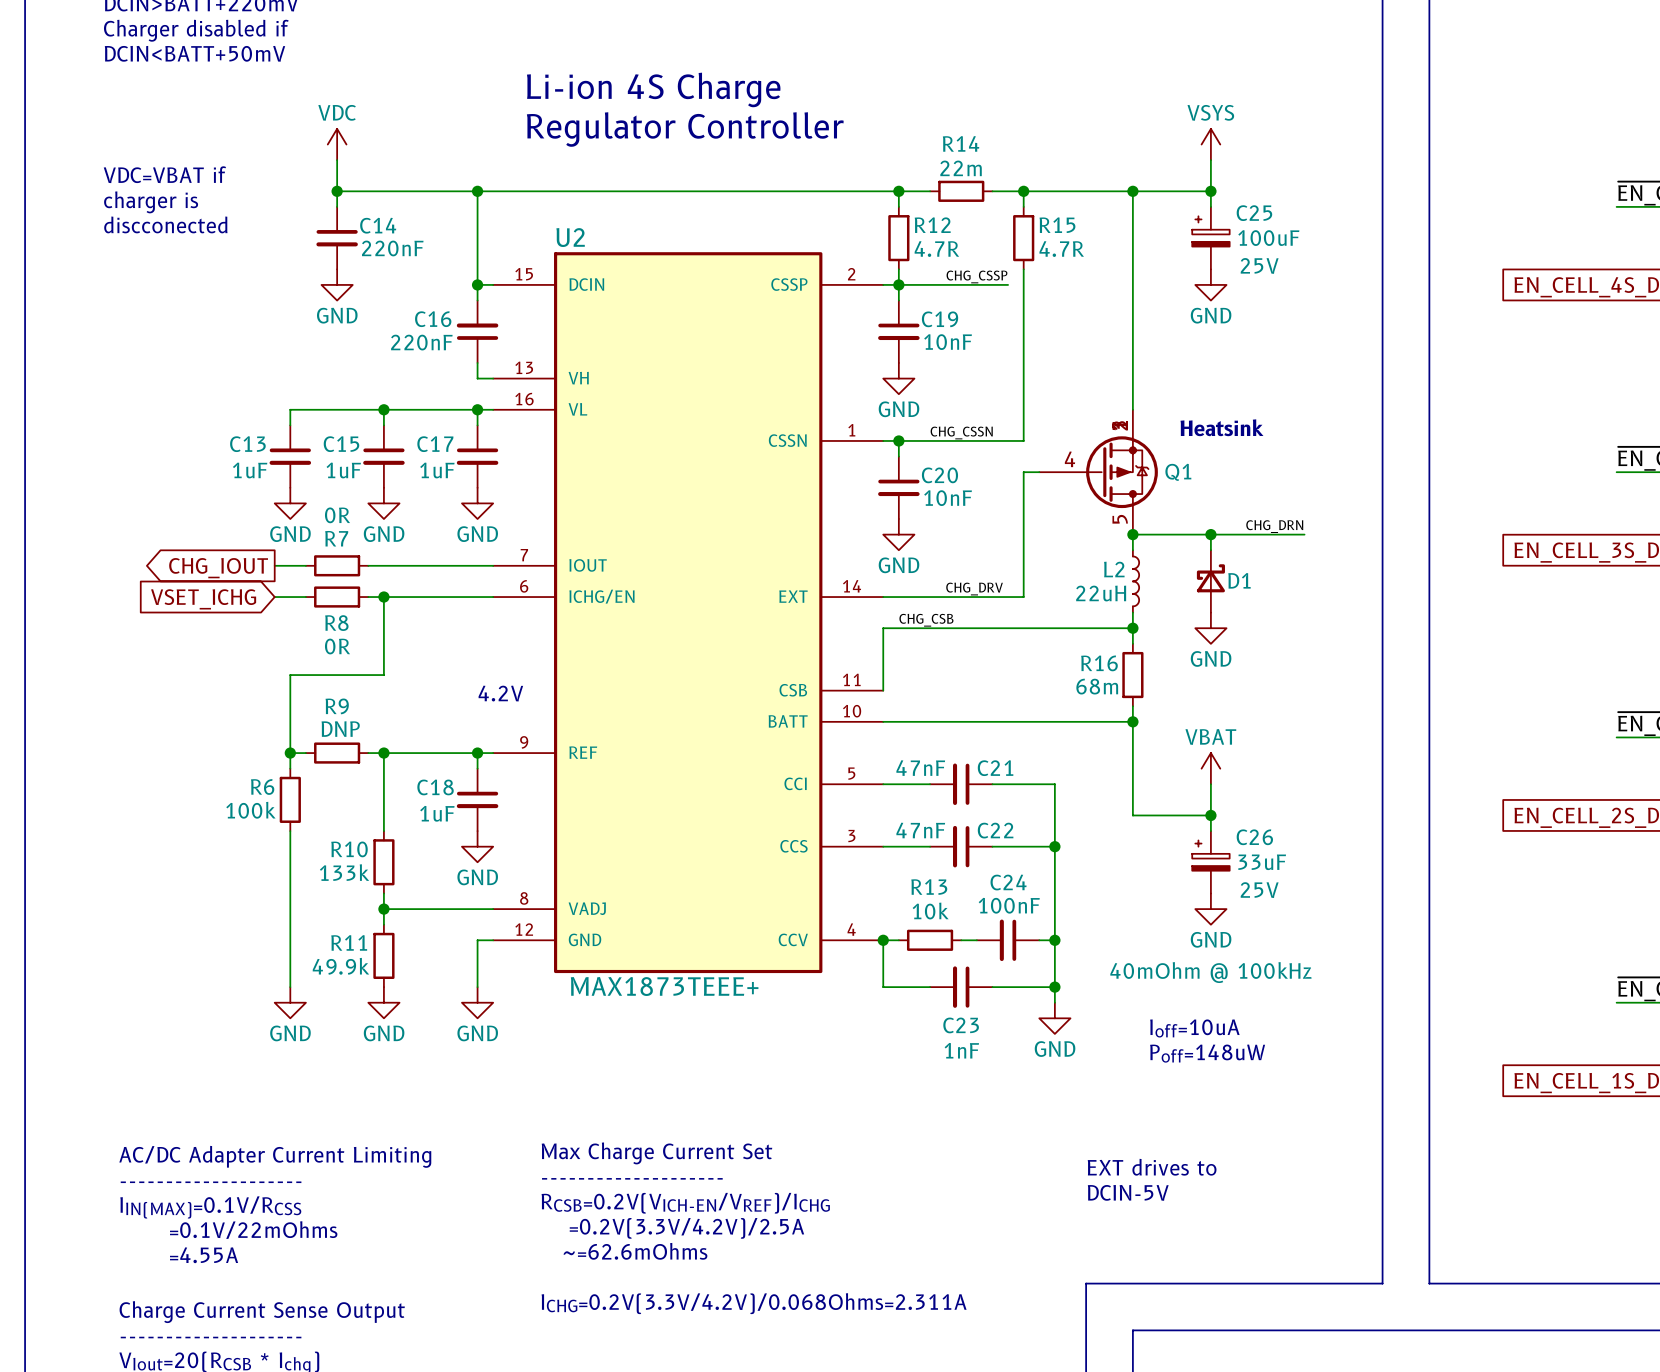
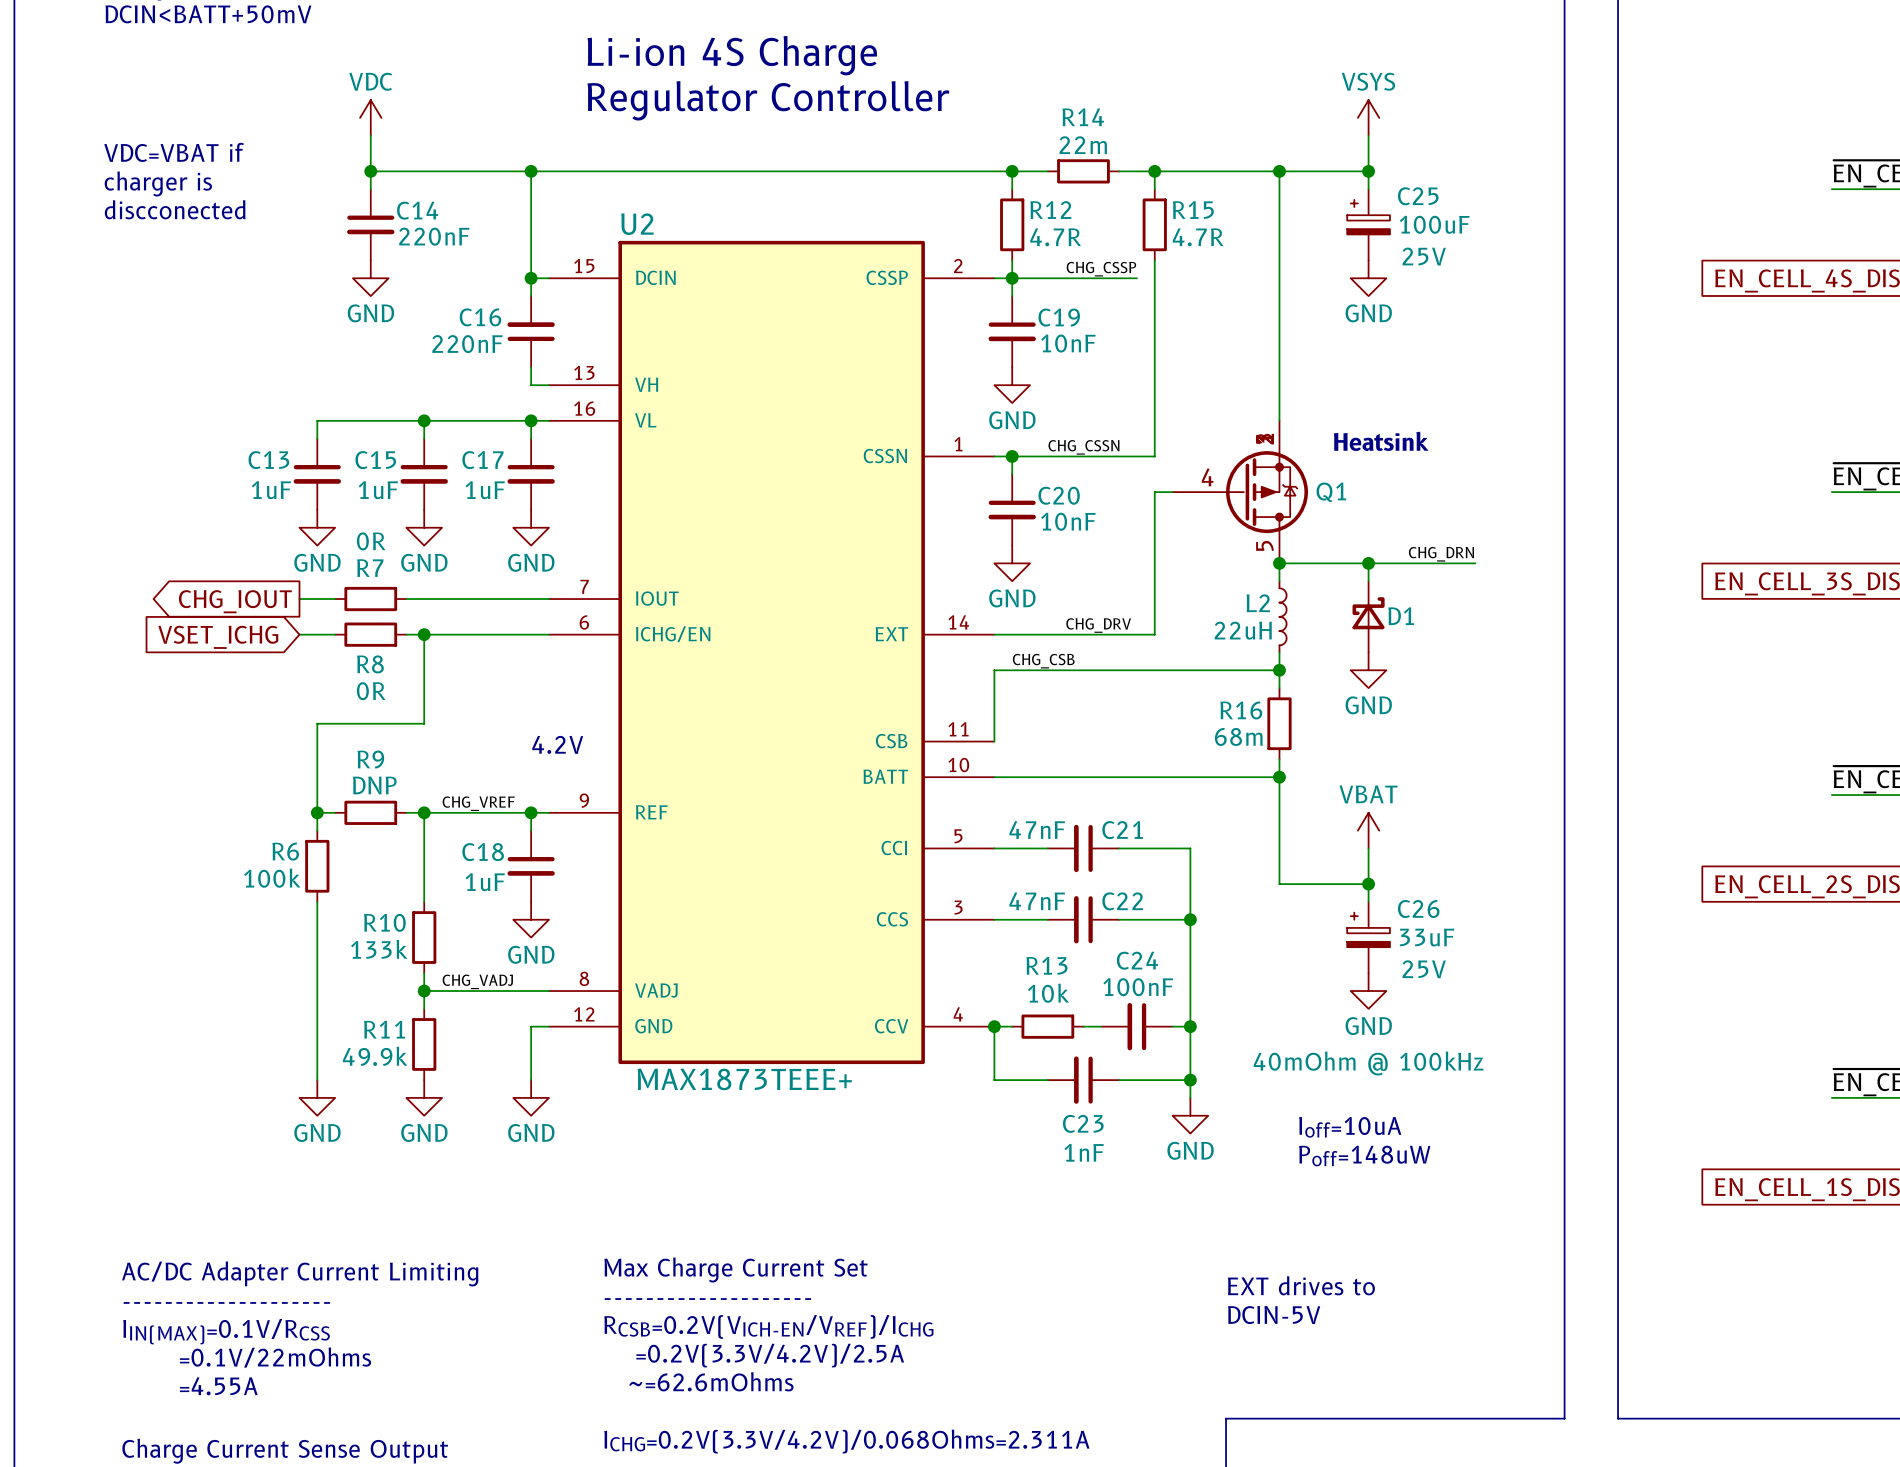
label: none -> CHG_VREF (478, 803)
label: none -> CHG_VADJ (477, 981)

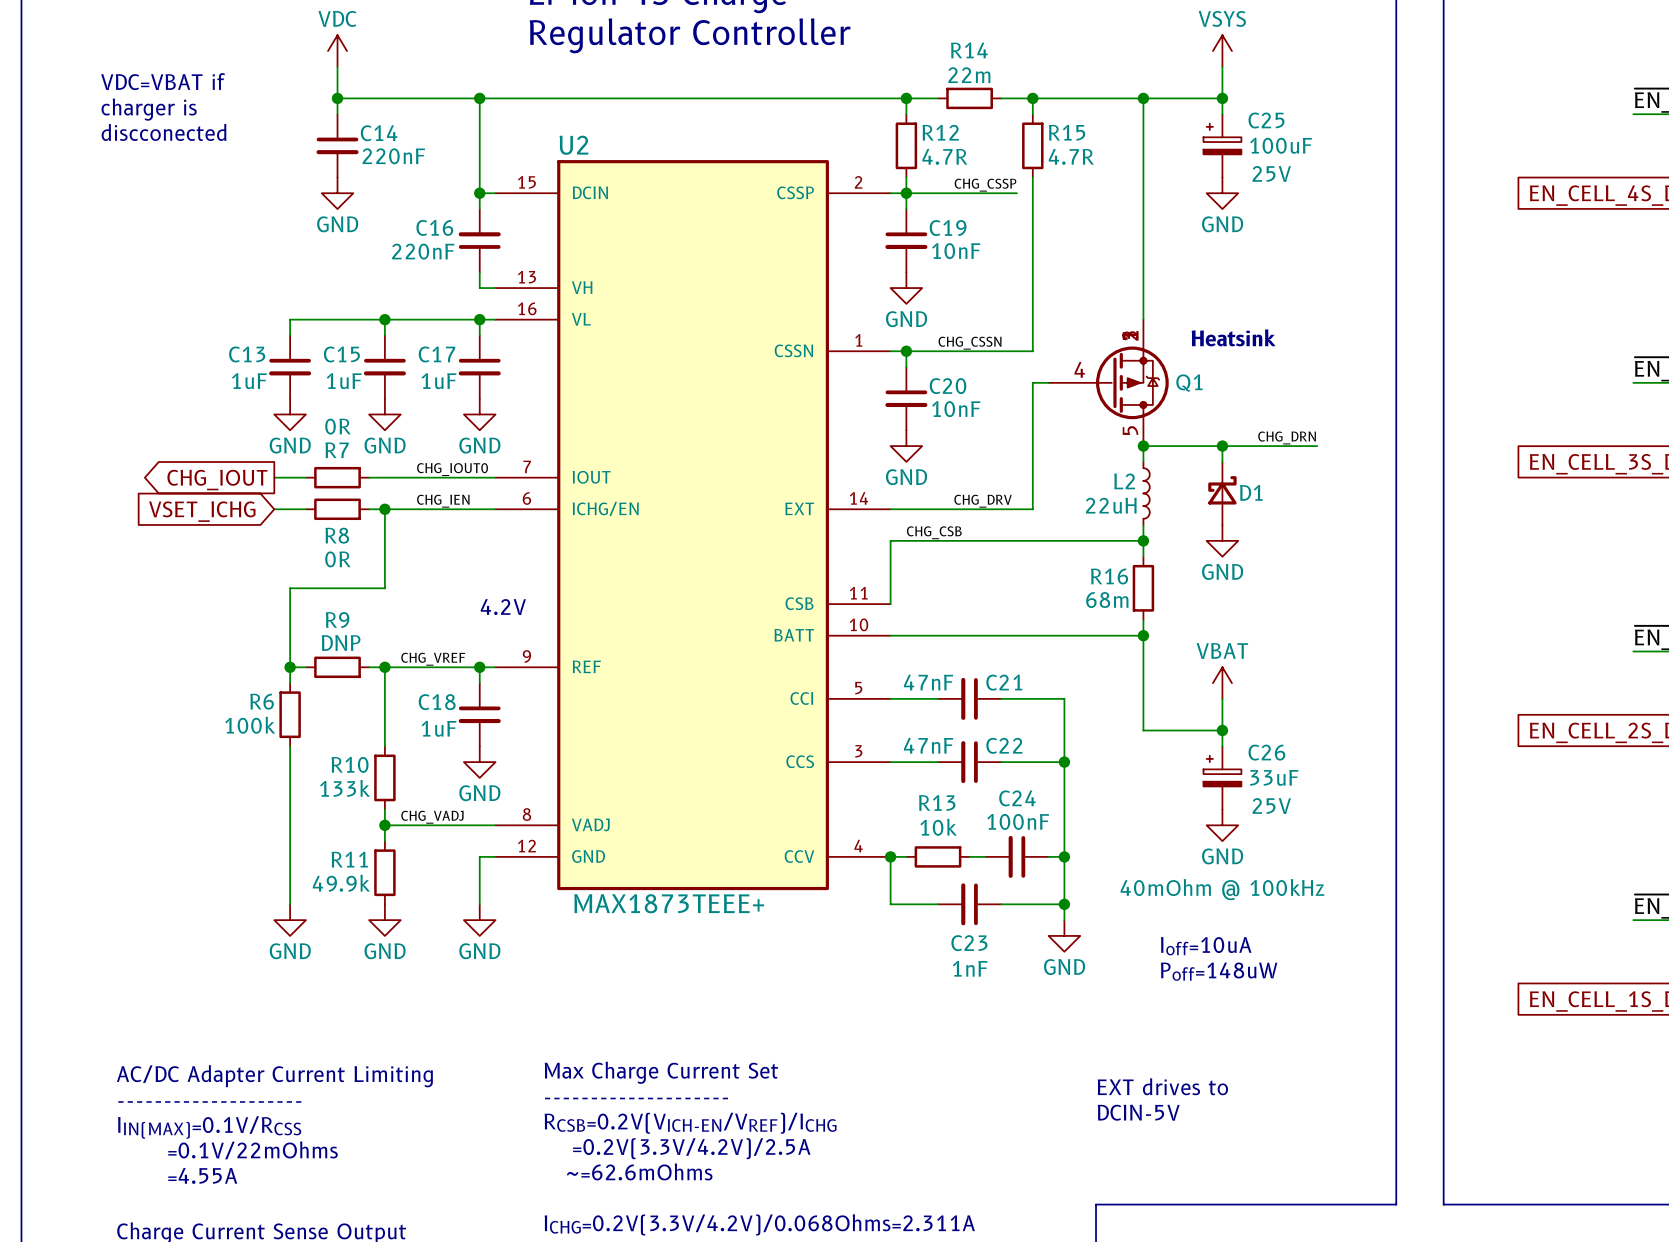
label: none -> CHG_IOUT0 (452, 469)
label: none -> CHG_IEN (443, 501)

